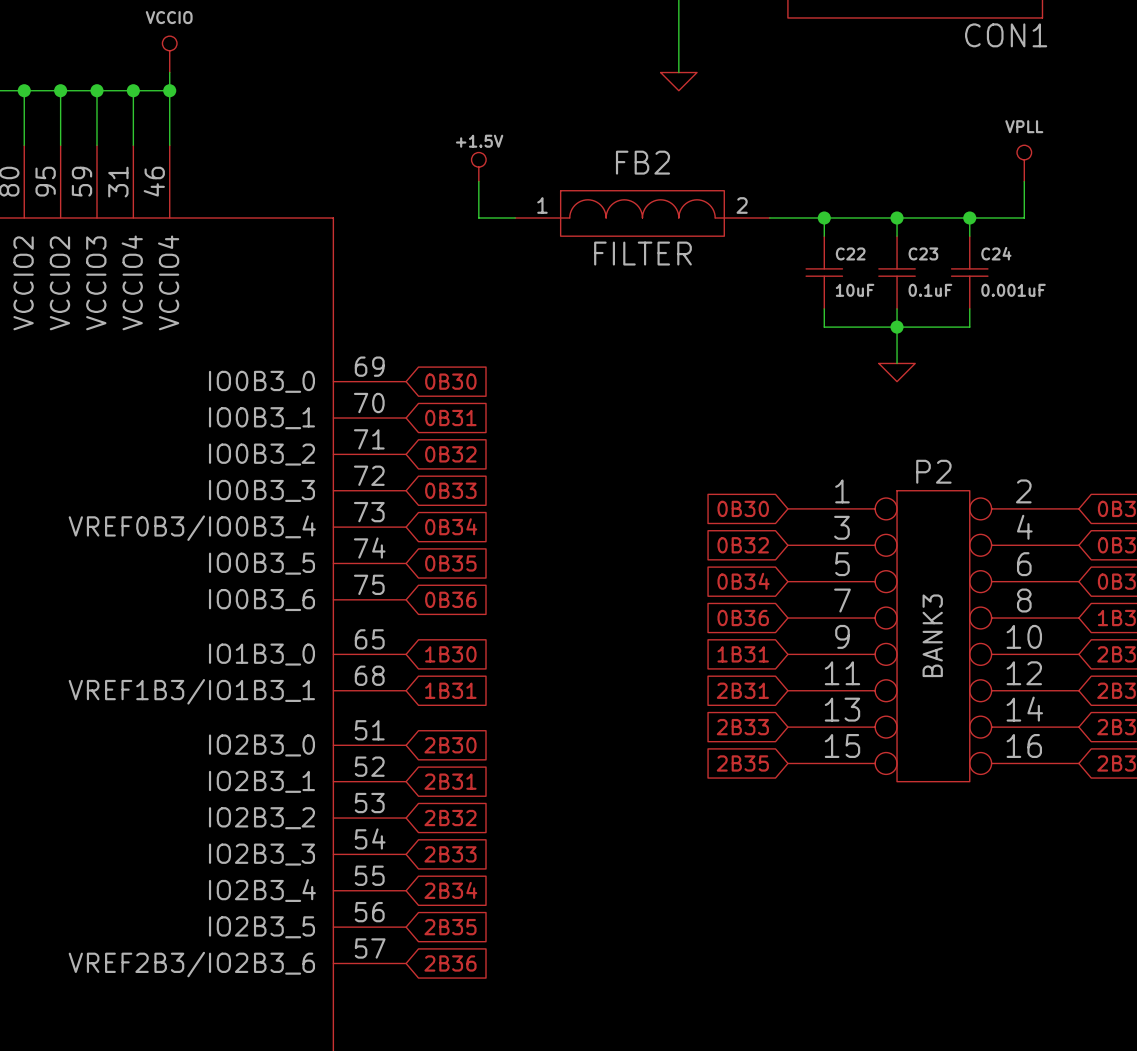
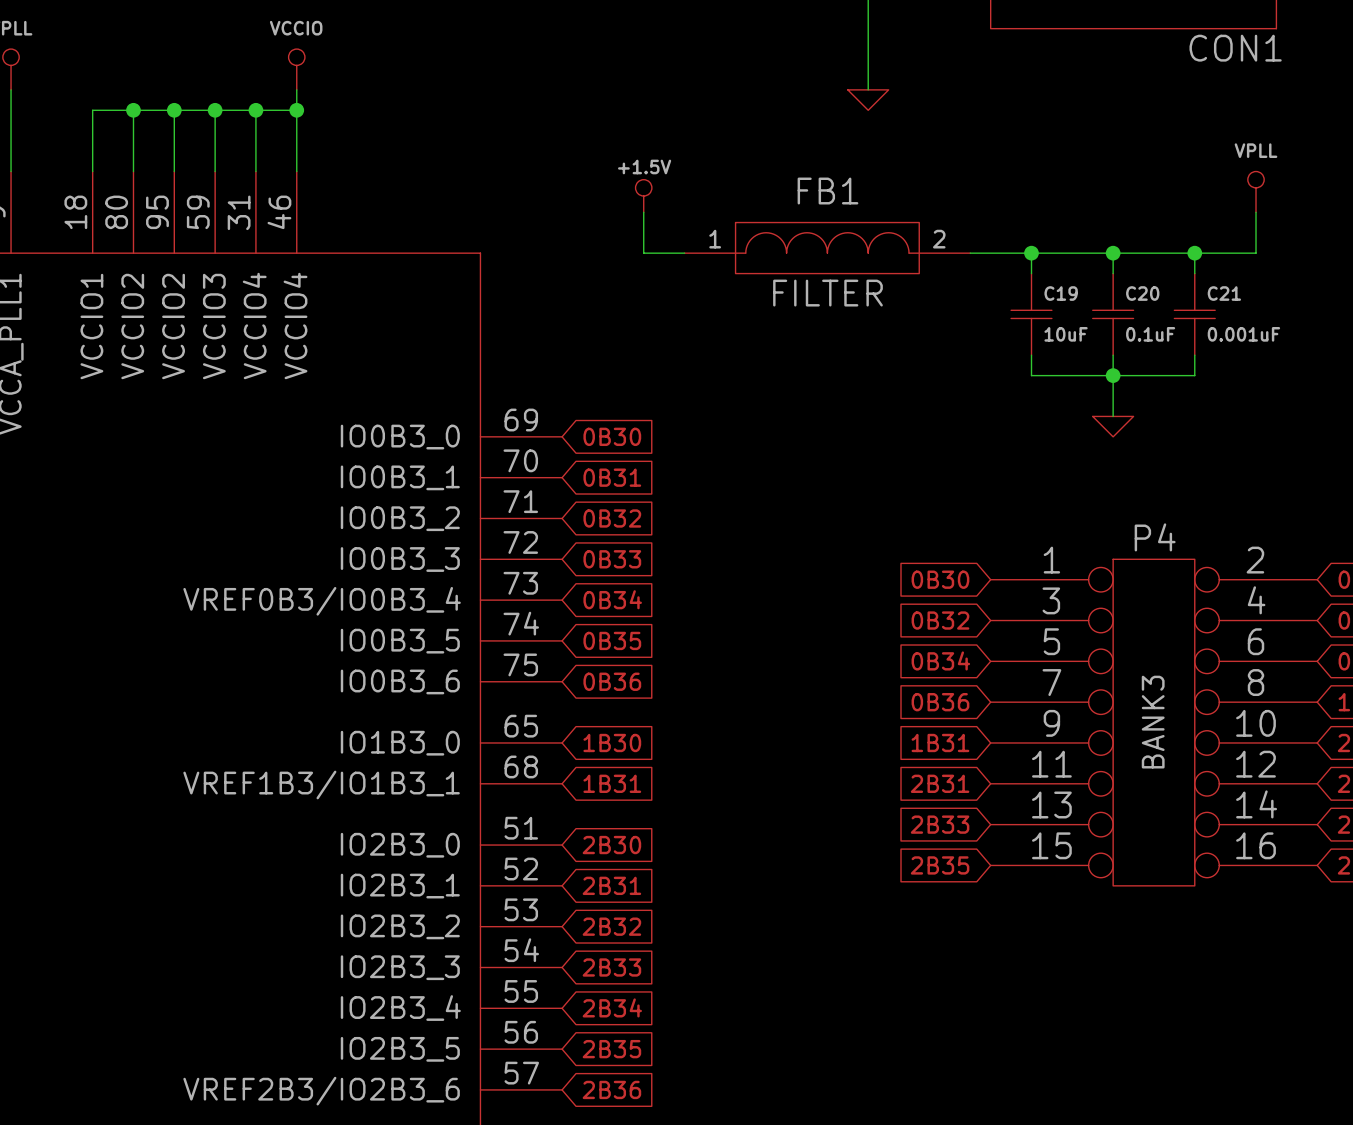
FB2 name: FB2 (642, 162) -> FB1 (827, 191)
C22 name: C22 (850, 253) -> C19 (1061, 293)
C23 name: C23 (923, 253) -> C20 (1142, 293)
C24 name: C24 (996, 253) -> C21 (1224, 293)
P2 name: P2 (933, 471) -> P4 (1155, 537)

